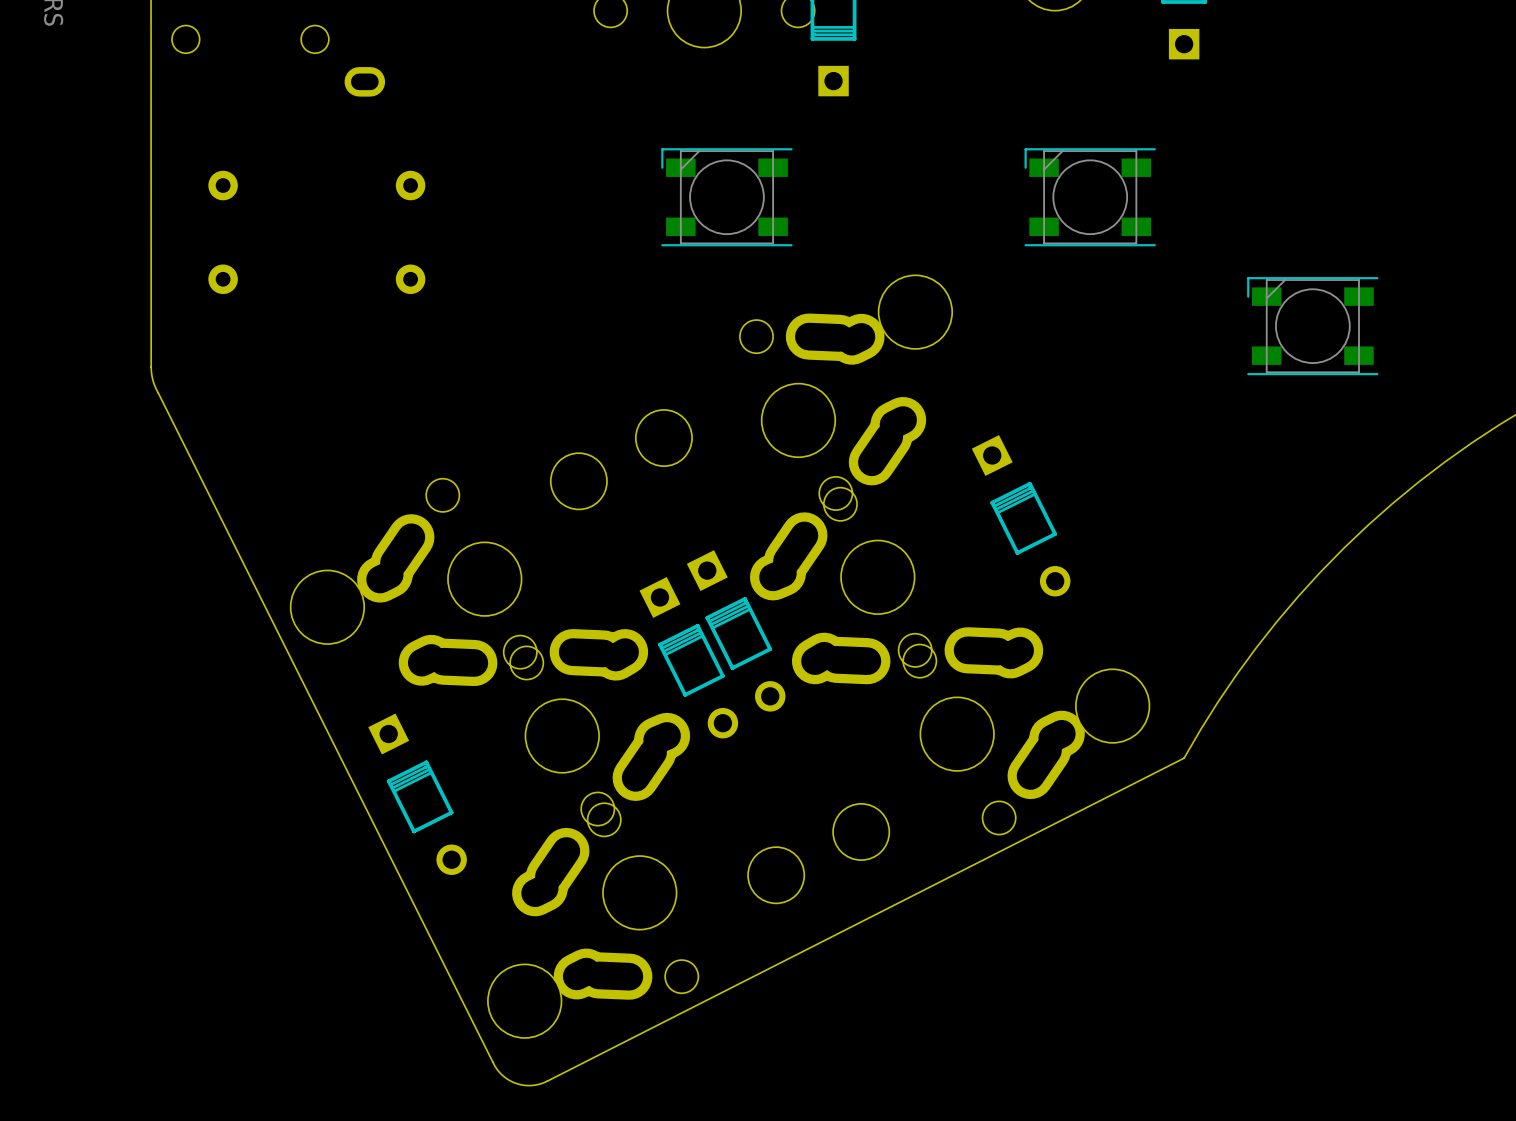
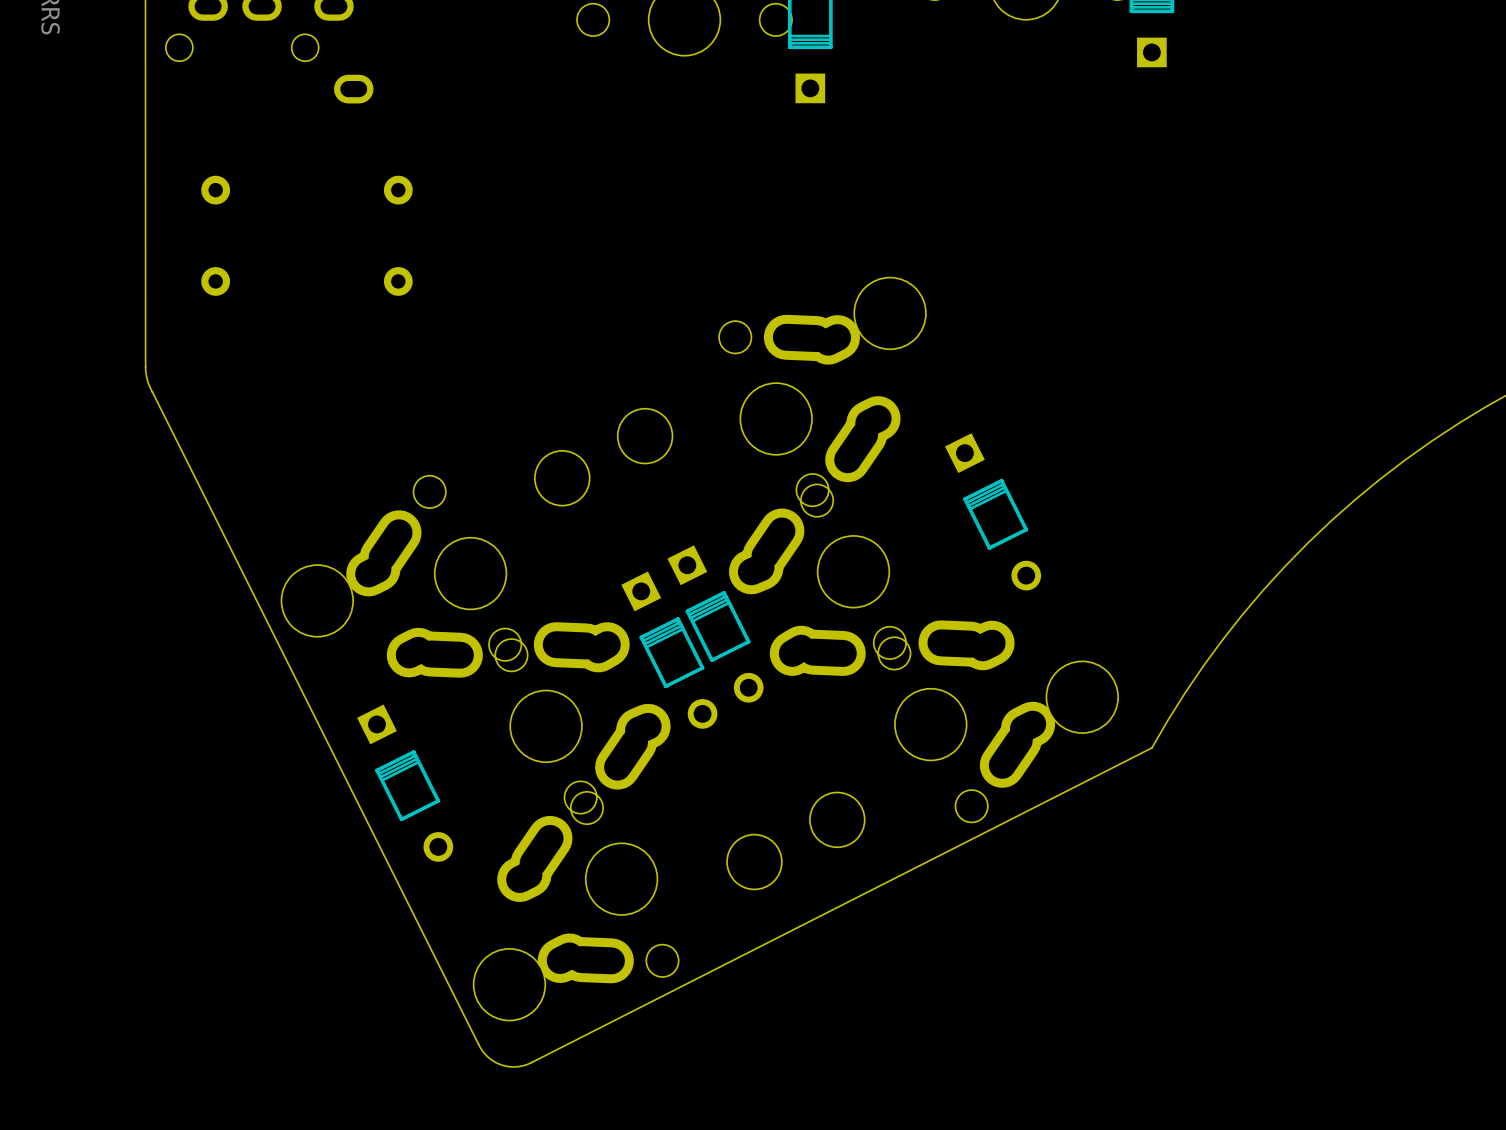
part: (726, 197) -> none
part: (1090, 197) -> none
part: (1312, 326) -> none

